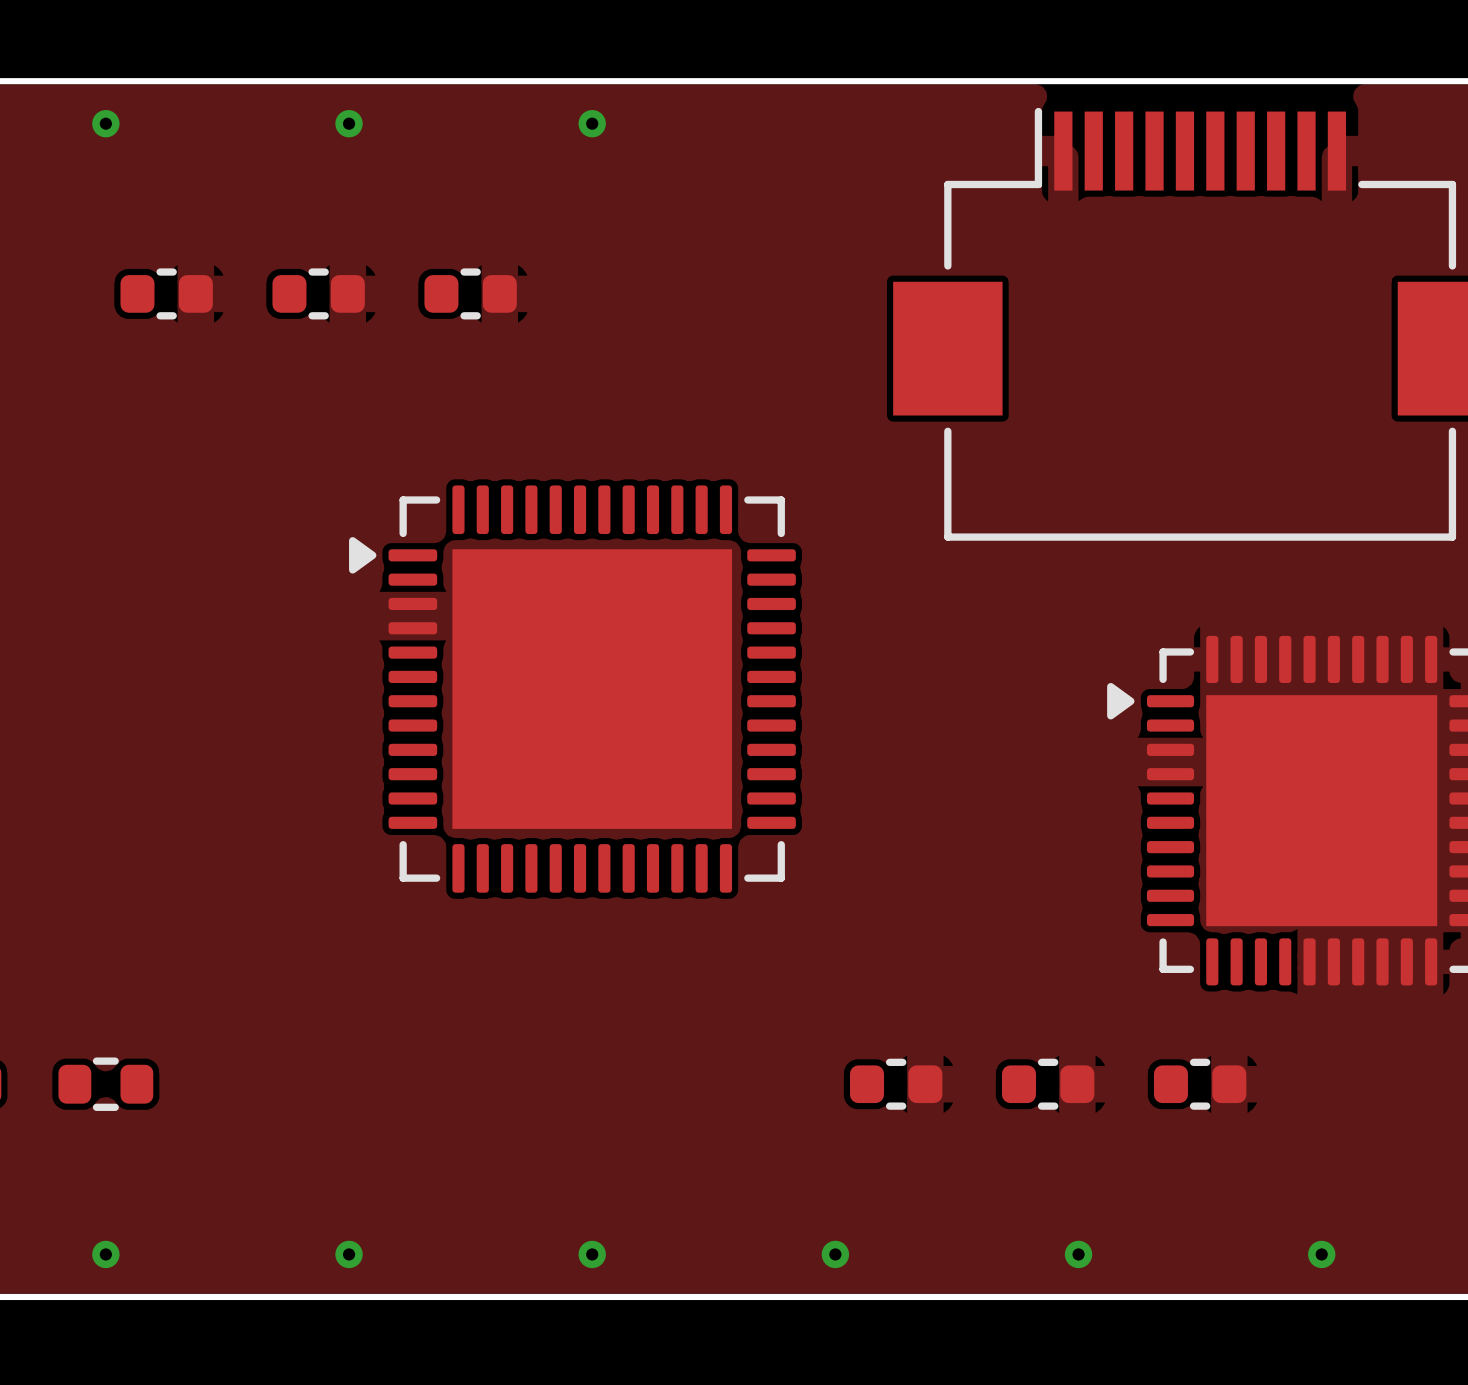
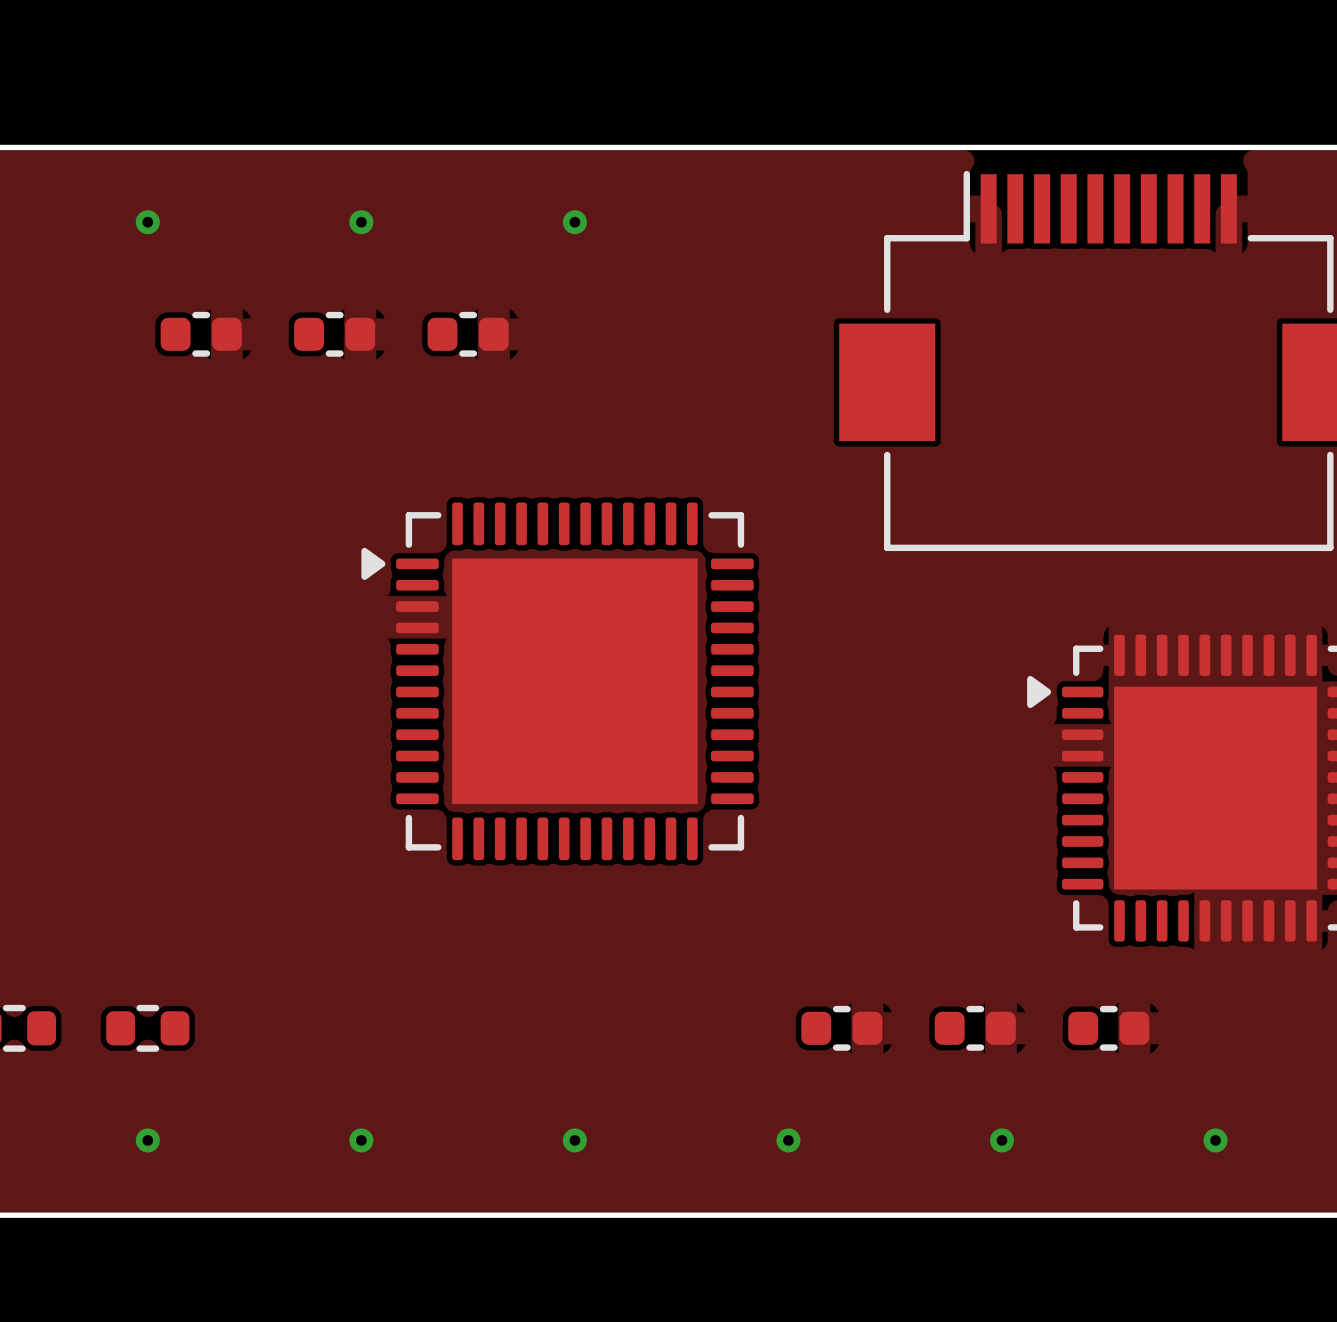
via position: (105, 123) -> (147, 222)
via position: (349, 123) -> (361, 222)
via position: (592, 123) -> (574, 222)
via position: (105, 1254) -> (147, 1140)
via position: (349, 1254) -> (361, 1140)
via position: (592, 1254) -> (574, 1140)
via position: (835, 1254) -> (788, 1140)
via position: (1078, 1254) -> (1002, 1140)
via position: (1321, 1254) -> (1215, 1140)

